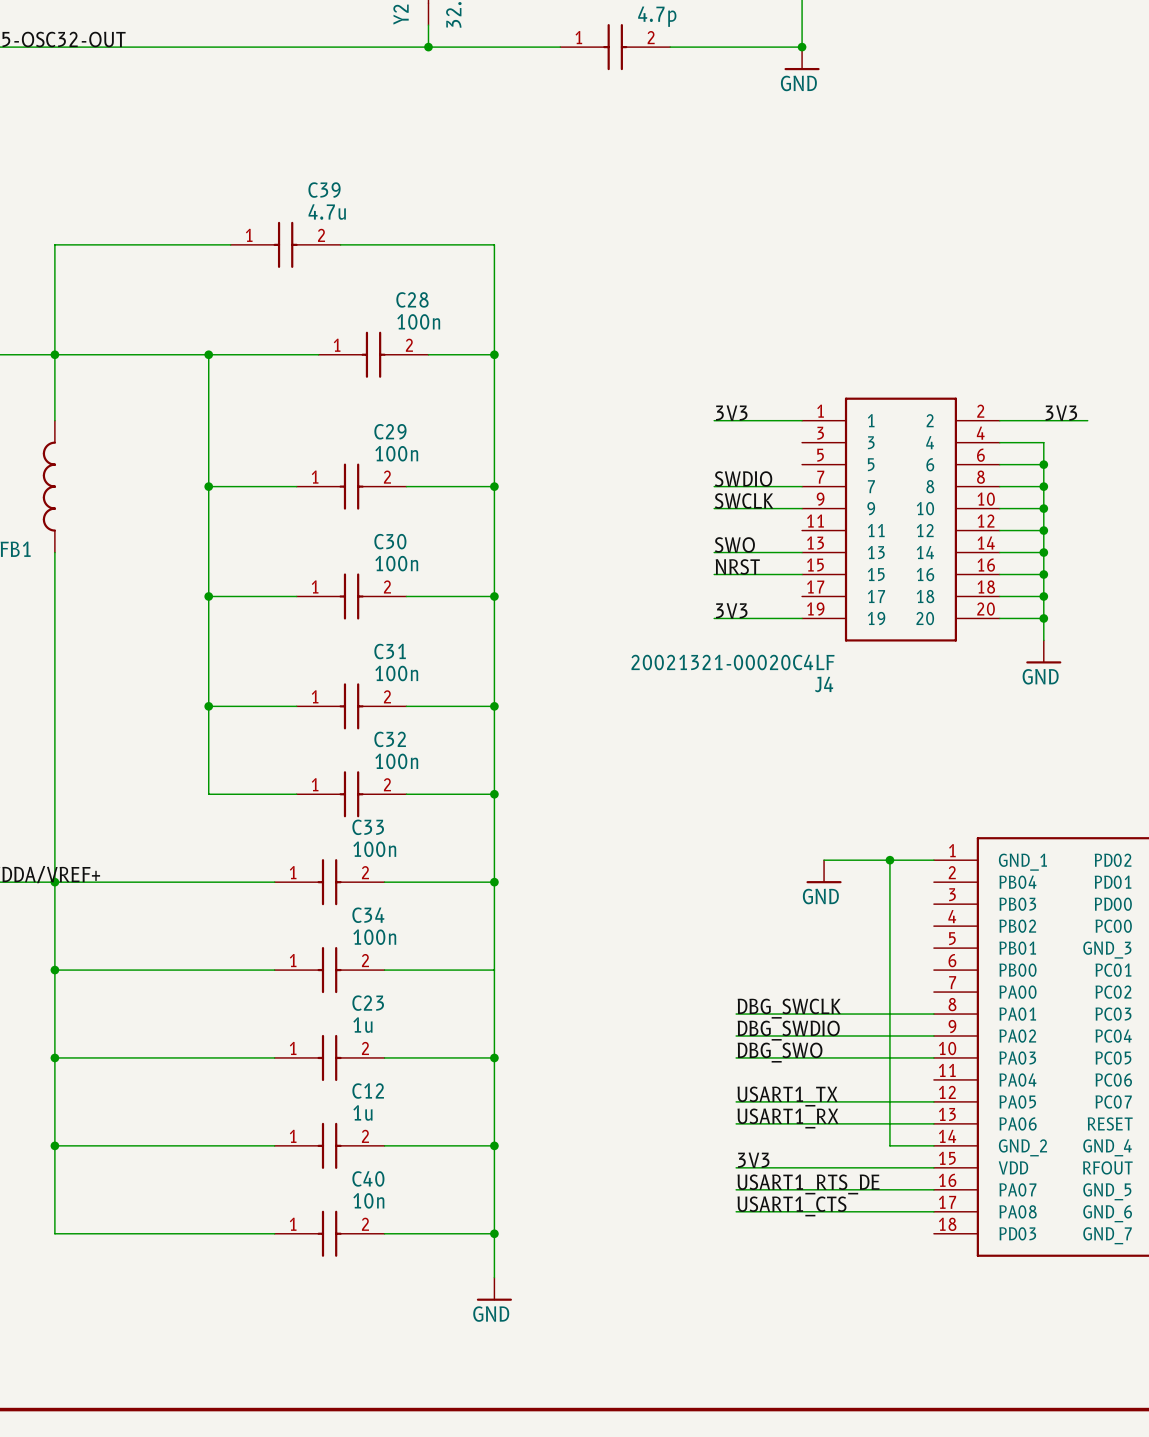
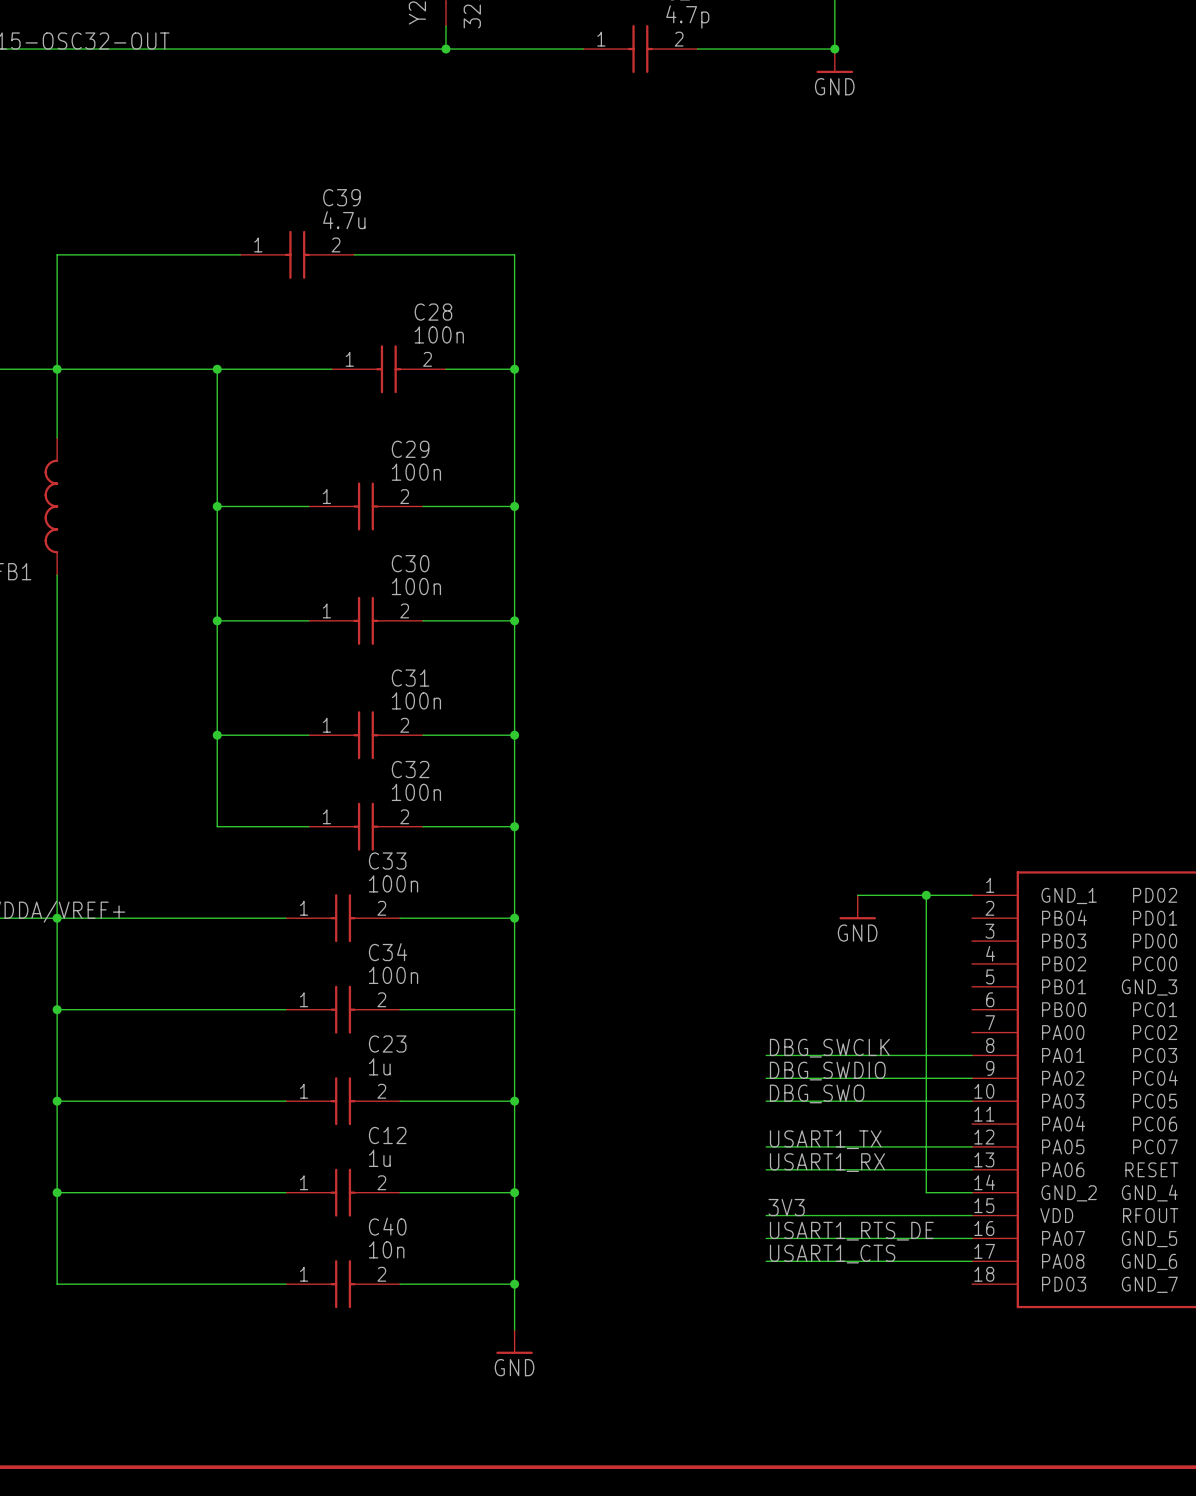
label: 3V3 (731, 413) -> none
label: 3V3 (1061, 413) -> none
wire: (714, 420) (802, 420) -> none
wire: (999, 420) (1087, 420) -> none
wire: (999, 442) (1043, 442) (1043, 640) -> none
wire: (999, 464) (1043, 464) -> none
junction: (1043, 464) -> none
label: SWDIO (743, 479) -> none
wire: (714, 486) (802, 486) -> none
wire: (999, 486) (1043, 486) -> none
junction: (1043, 486) -> none
label: SWCLK (744, 500) -> none
wire: (714, 508) (802, 508) -> none
wire: (999, 508) (1043, 508) -> none
junction: (1043, 508) -> none
J4: 20021321-00020C4LF (900, 519) -> none
wire: (999, 530) (1043, 530) -> none
junction: (1043, 530) -> none
label: SWO (734, 544) -> none
wire: (714, 552) (802, 552) -> none
wire: (999, 552) (1043, 552) -> none
junction: (1043, 552) -> none
label: NRST (737, 566) -> none
wire: (714, 574) (802, 574) -> none
wire: (999, 574) (1043, 574) -> none
junction: (1043, 574) -> none
wire: (999, 596) (1043, 596) -> none
junction: (1043, 596) -> none
label: 3V3 (731, 610) -> none
wire: (714, 618) (802, 618) -> none
wire: (999, 618) (1043, 618) -> none
junction: (1043, 618) -> none
power symbol: GND (1043, 651) -> none

